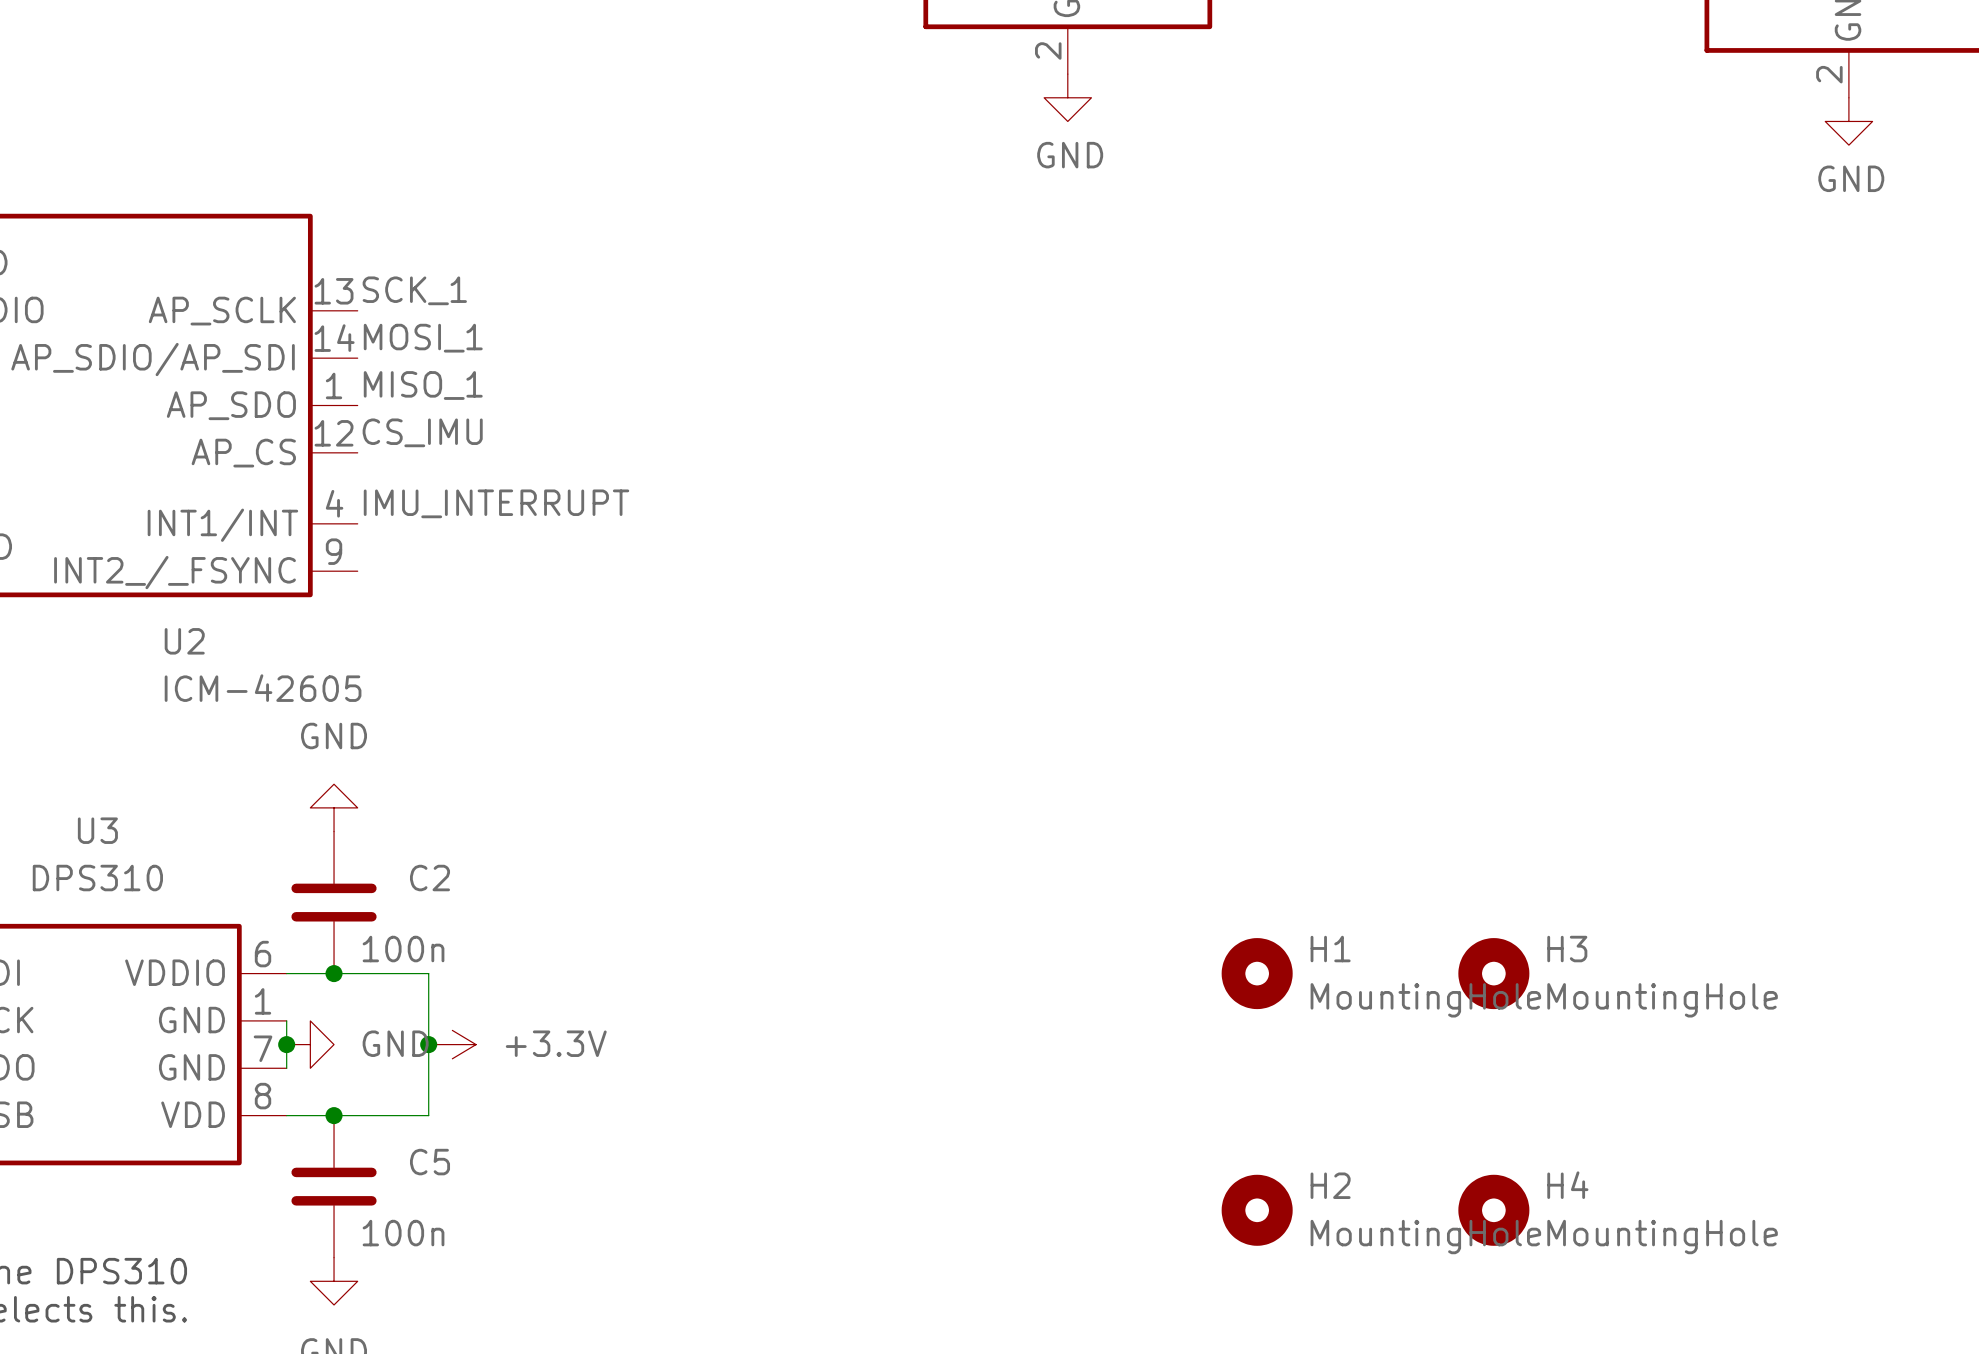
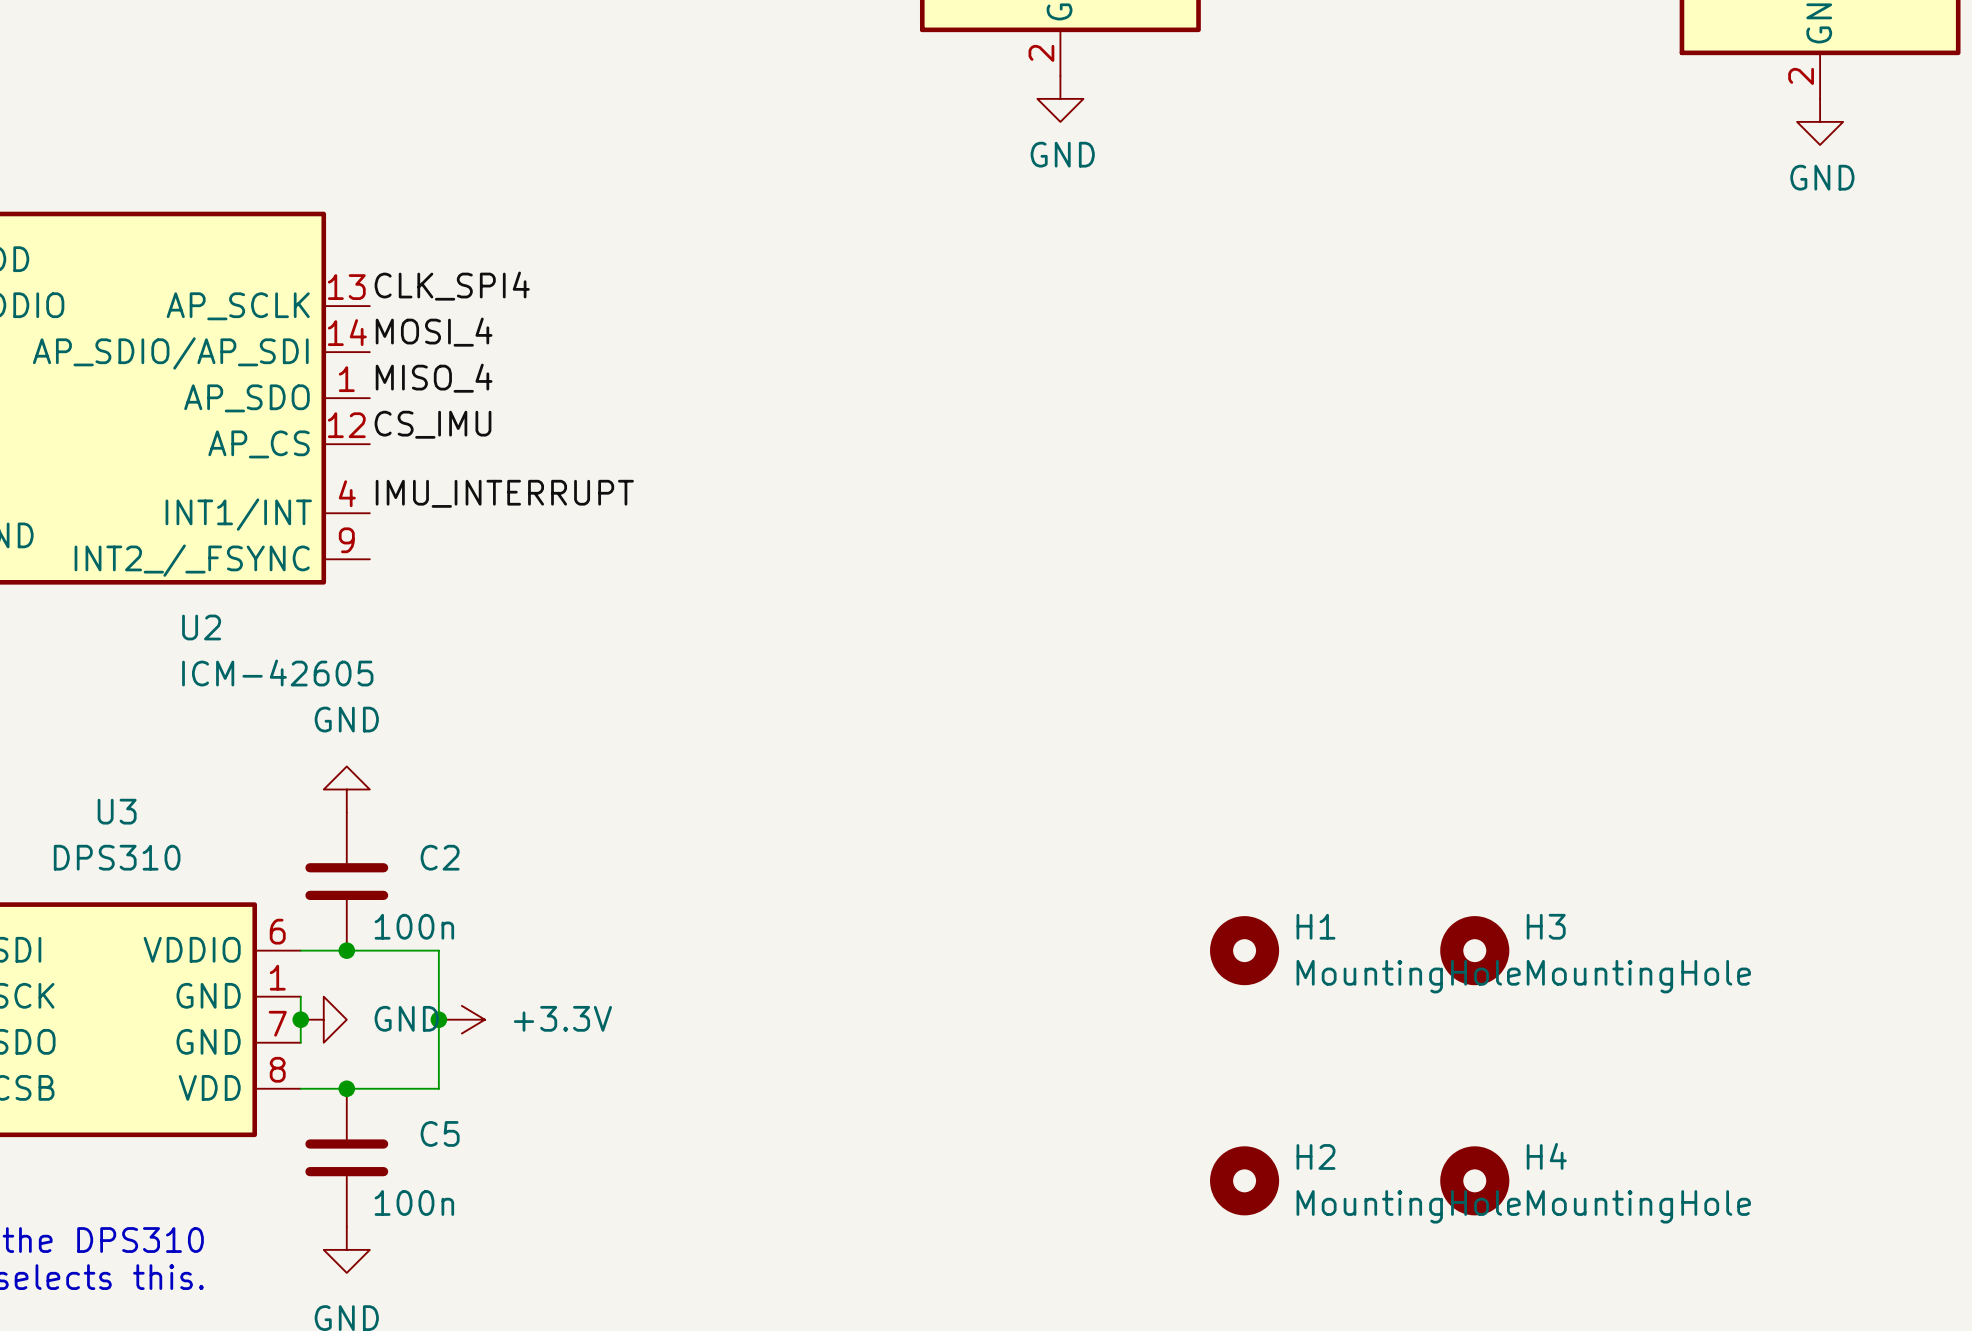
label: SCK_1 (414, 290) -> CLK_SPI4 (452, 286)
label: MOSI_1 (423, 338) -> MOSI_4 (434, 332)
label: MISO_1 (423, 385) -> MISO_4 (434, 378)

